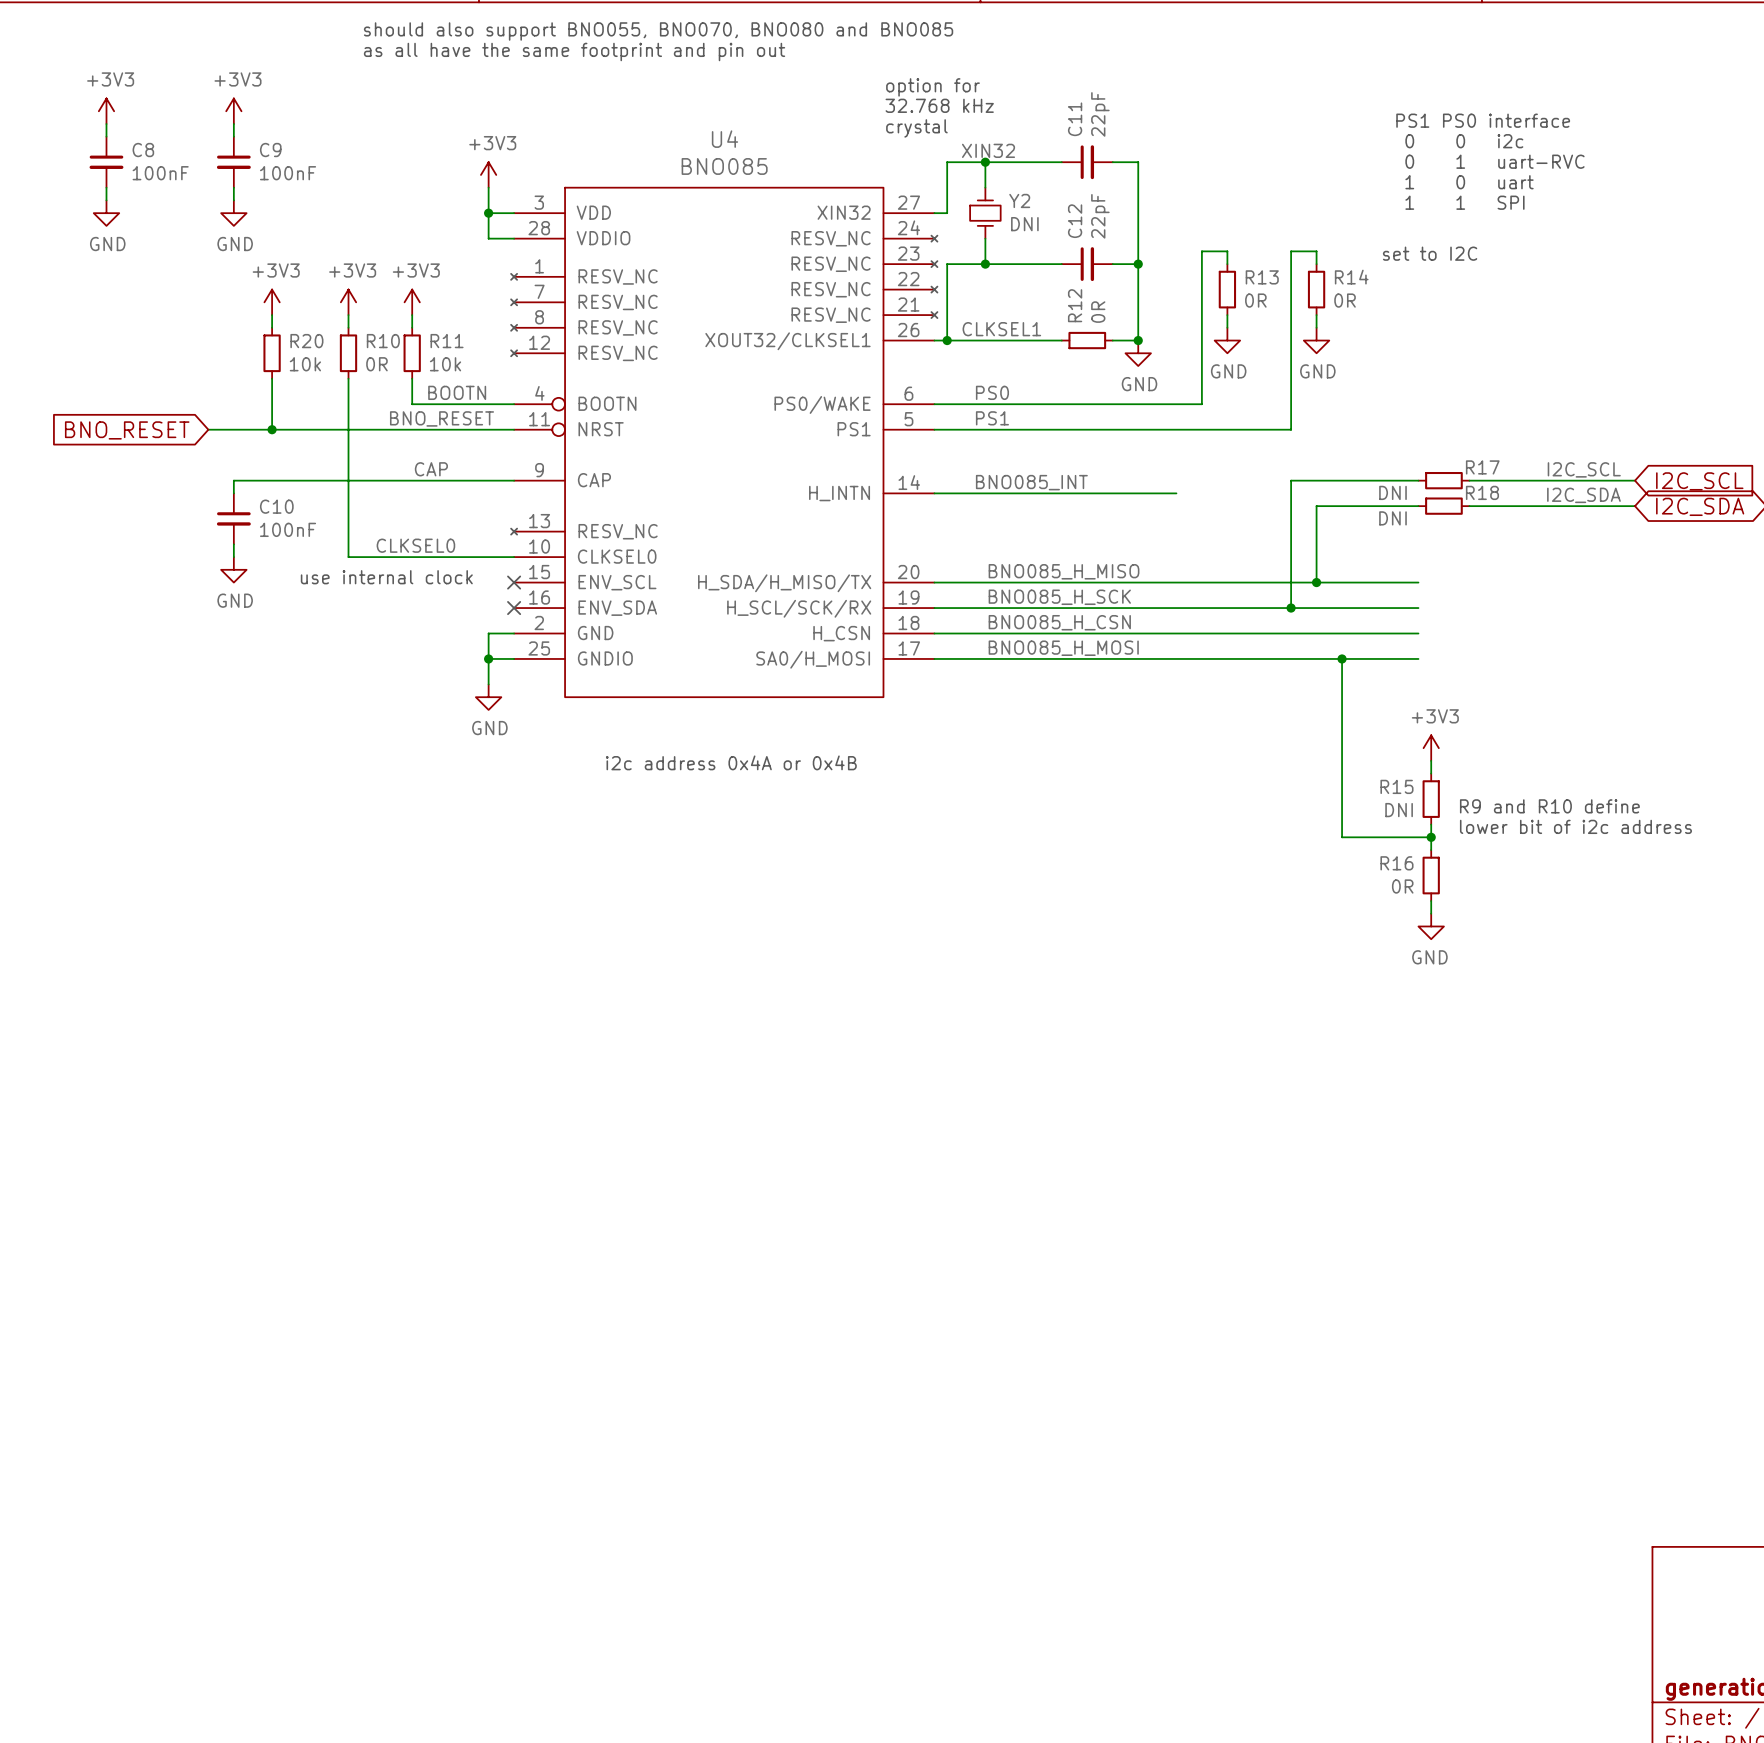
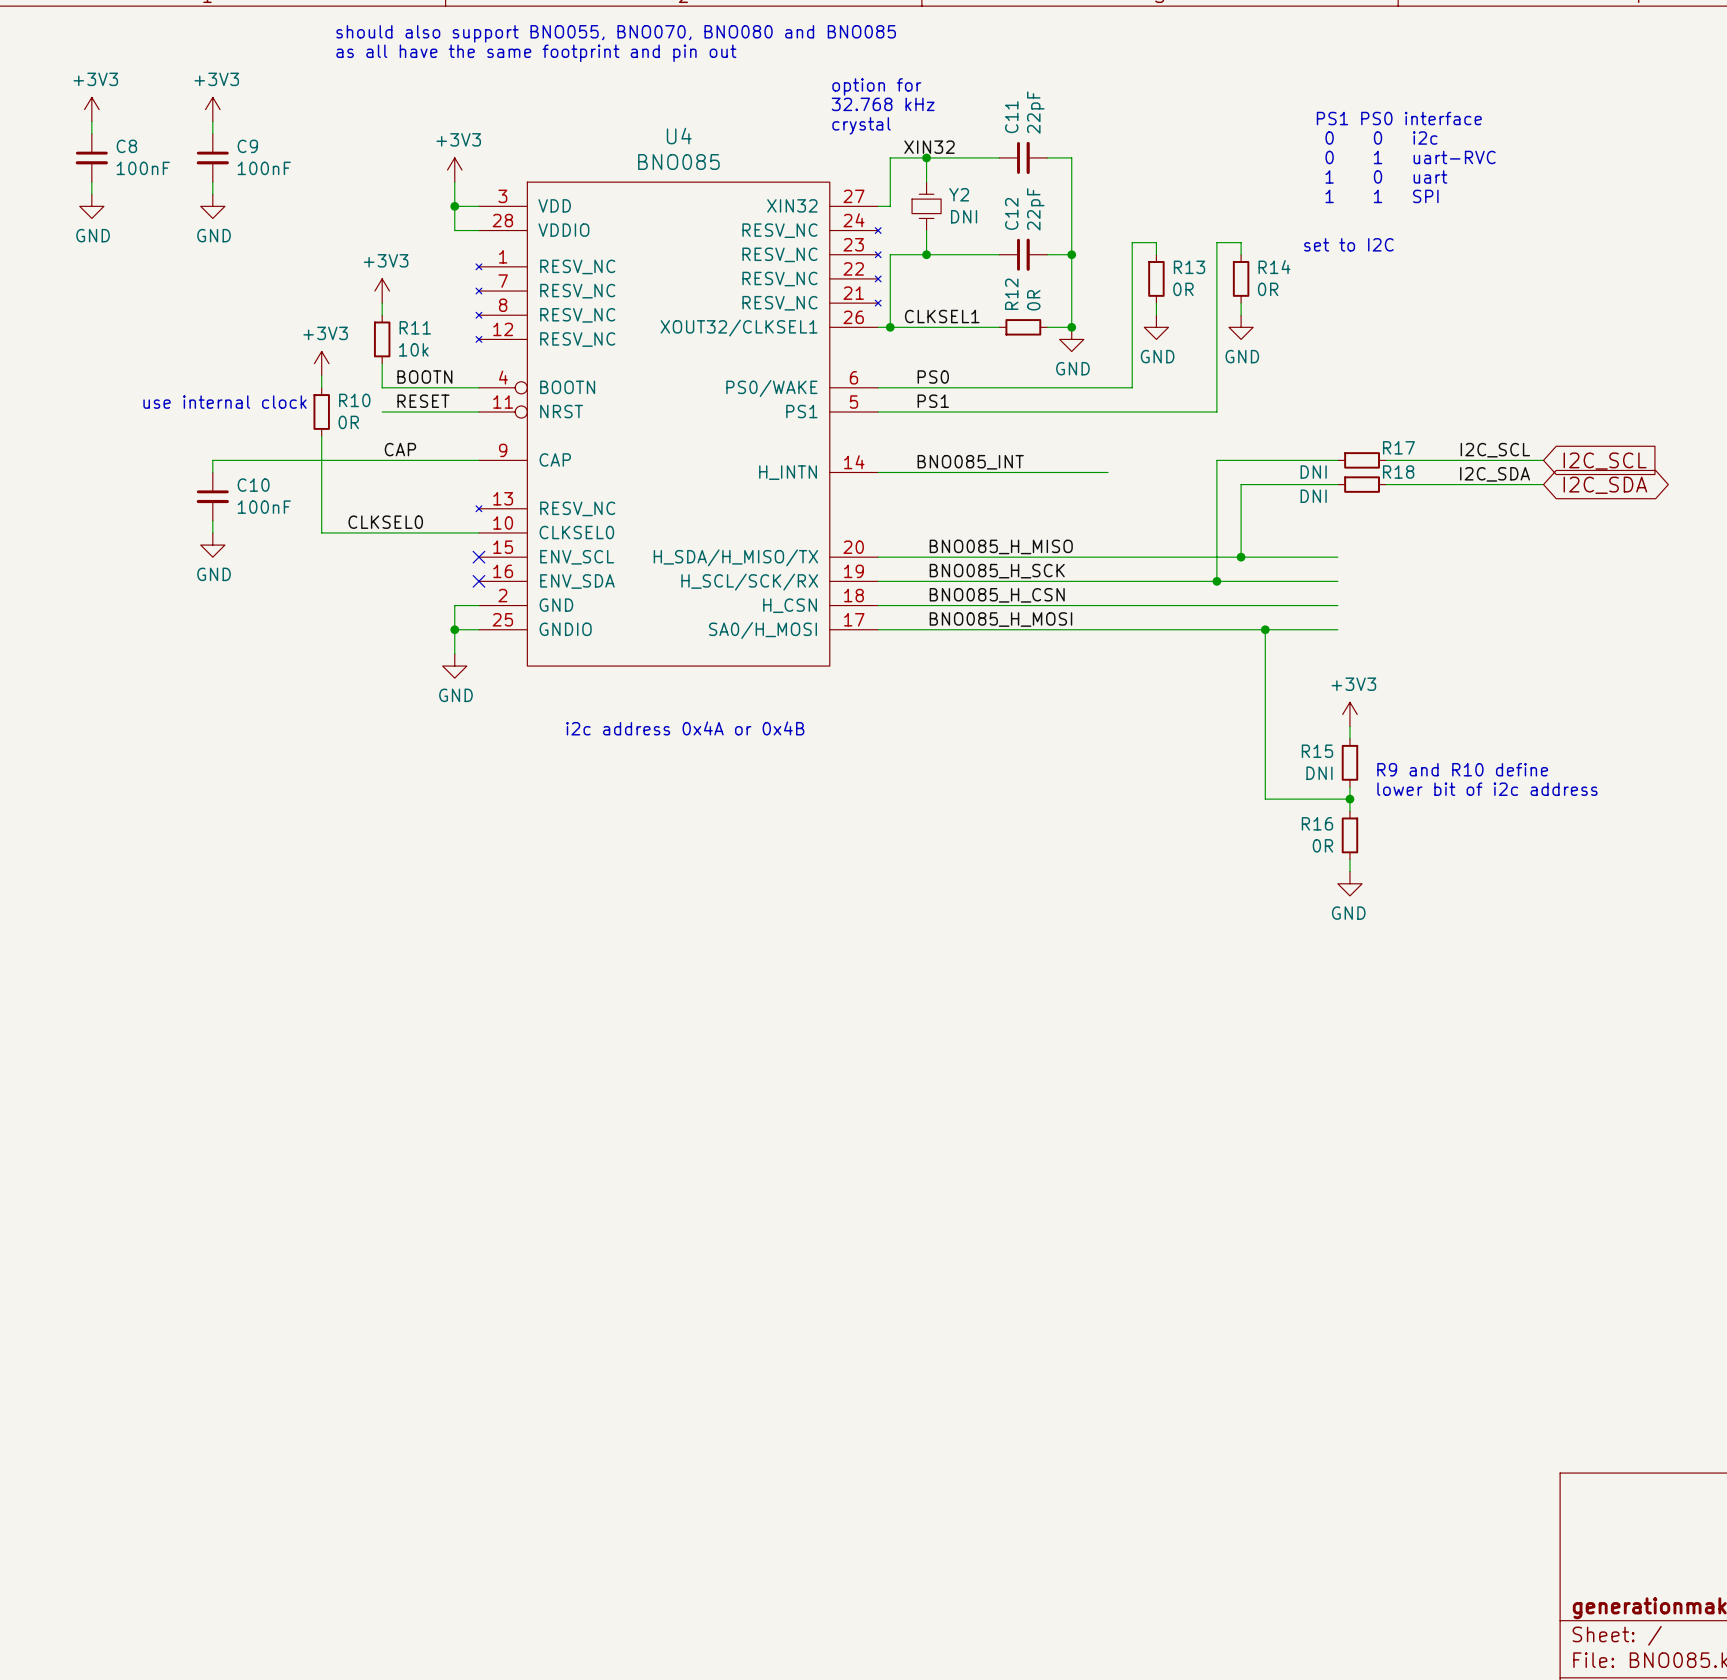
power symbol: +3V3 (272, 302) -> none
power symbol: +3V3 (348, 302) -> none
wire: (272, 315) (272, 327) -> none
wire: (348, 315) (348, 327) -> none
R20: 10k (272, 353) -> none
R10 position: (348, 353) -> (321, 412)
wire: (272, 378) (272, 429) -> none
power symbol: none -> +3V3 (321, 363)
wire: (348, 404) (348, 455) -> none
label: BNO_RESET (442, 418) -> RESET (423, 401)
wire: (208, 429) (412, 429) -> none
junction: (272, 429) -> none
global label: BNO_RESET (127, 430) -> none
text position: use internal clock (386, 577) -> use internal clock (225, 402)

